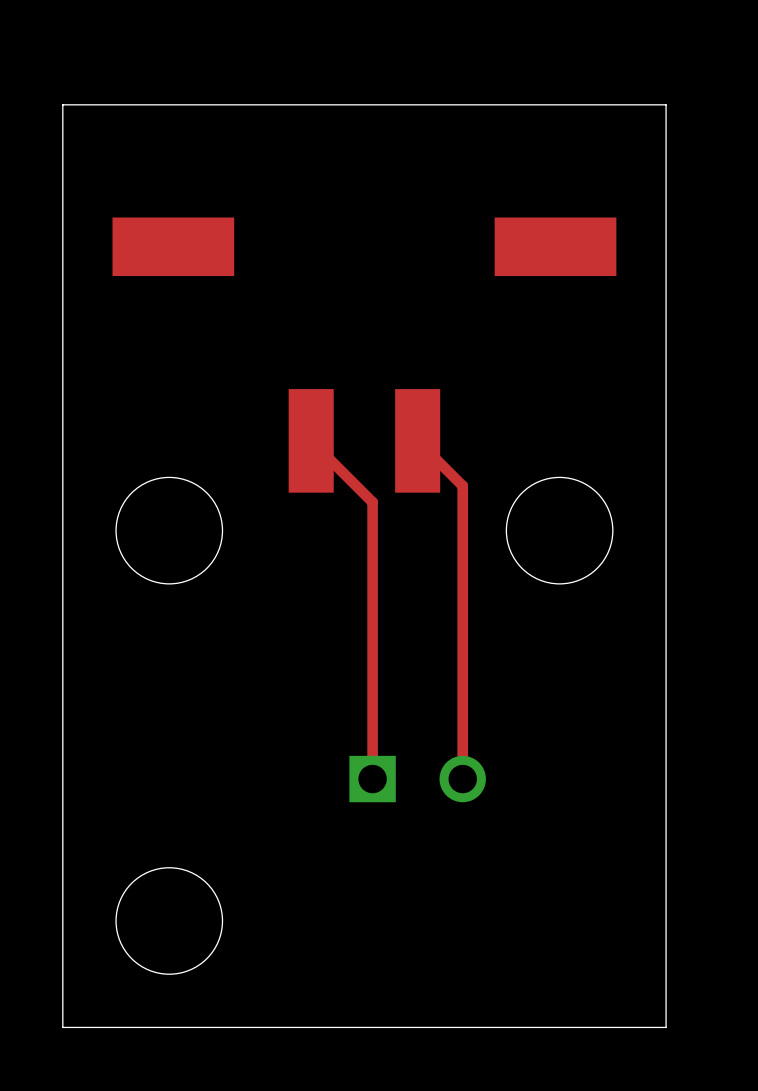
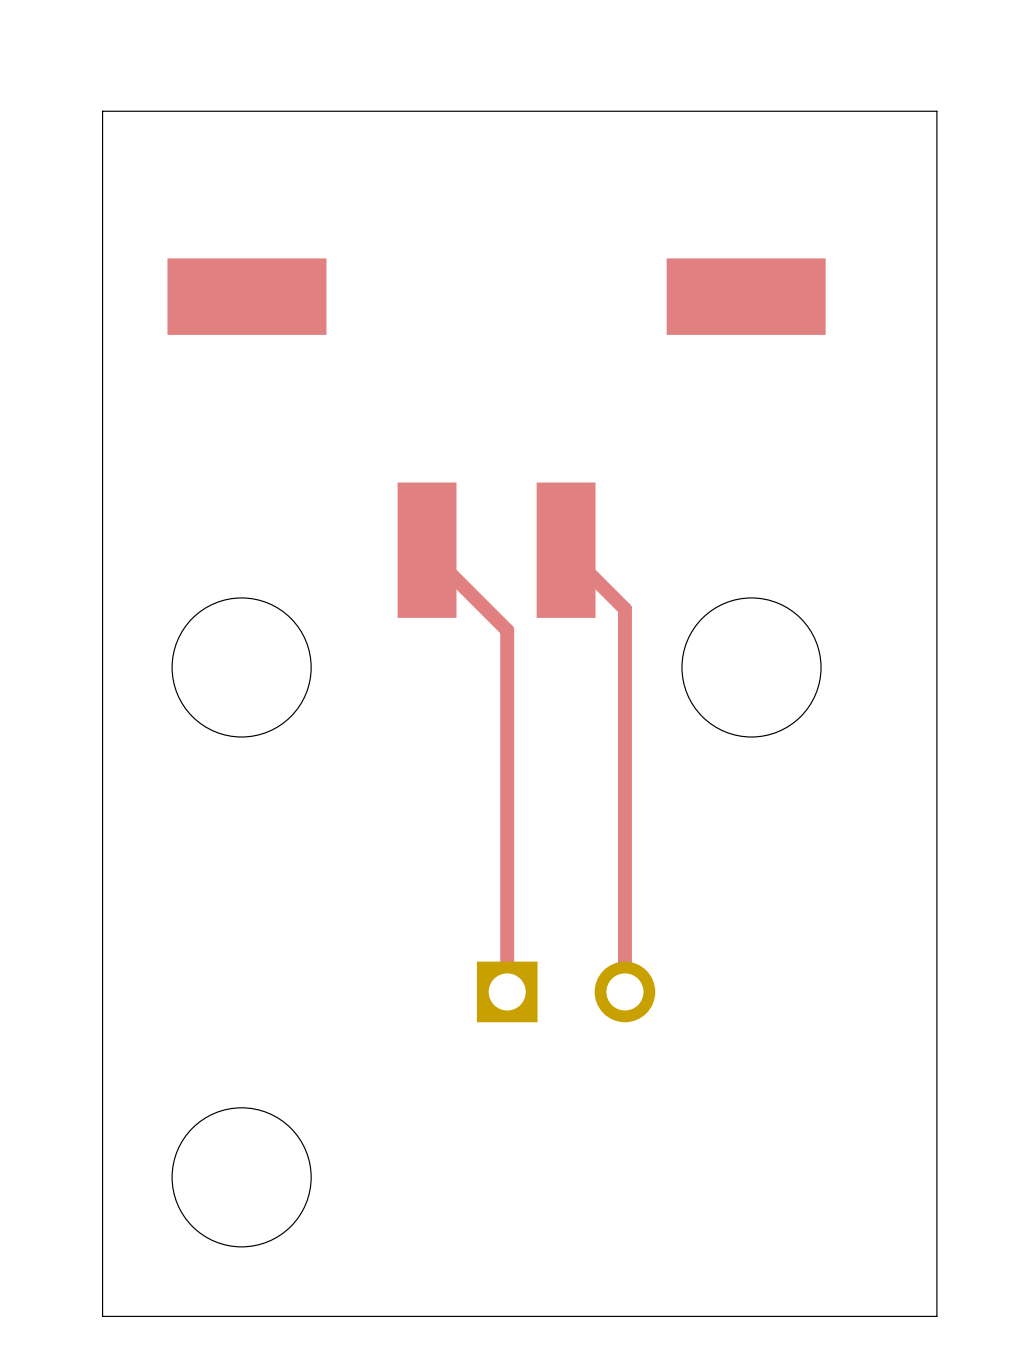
board edge: (666, 104) (666, 1027) -> (890, 111) (936, 111) (936, 1316) (890, 1316)

